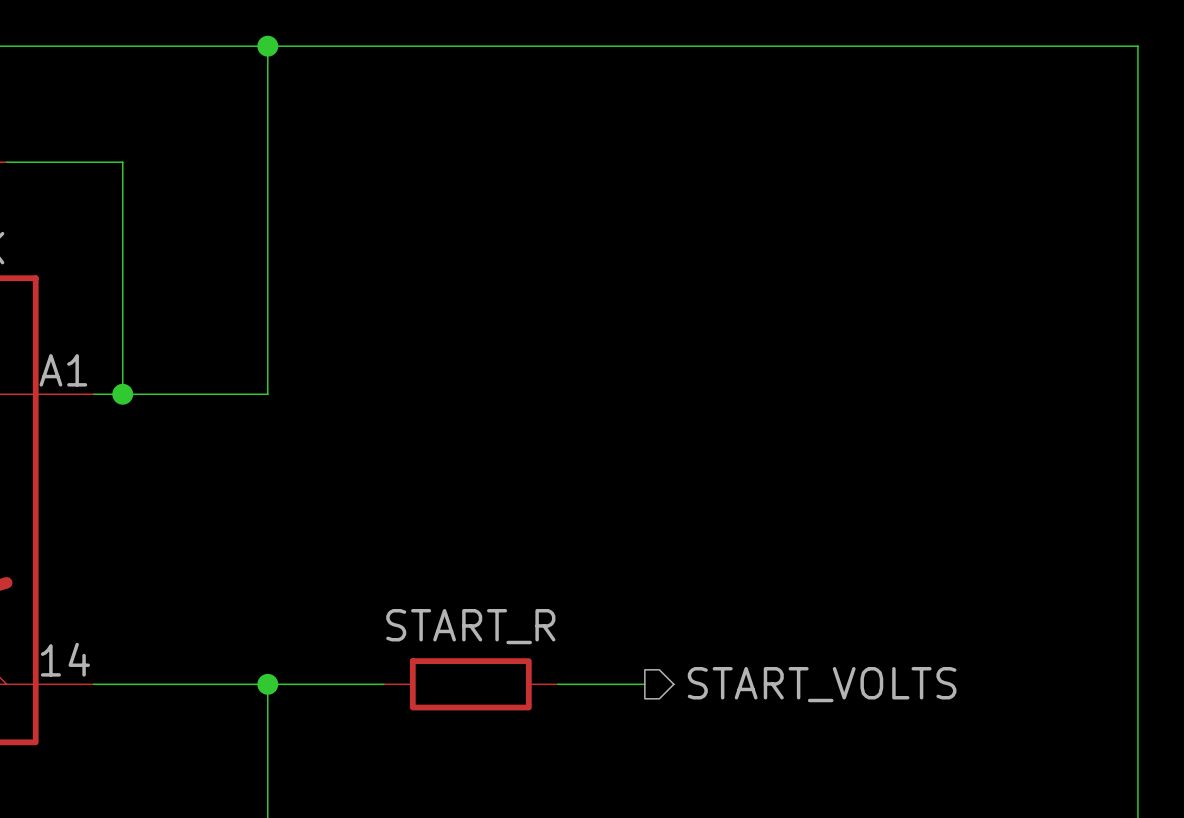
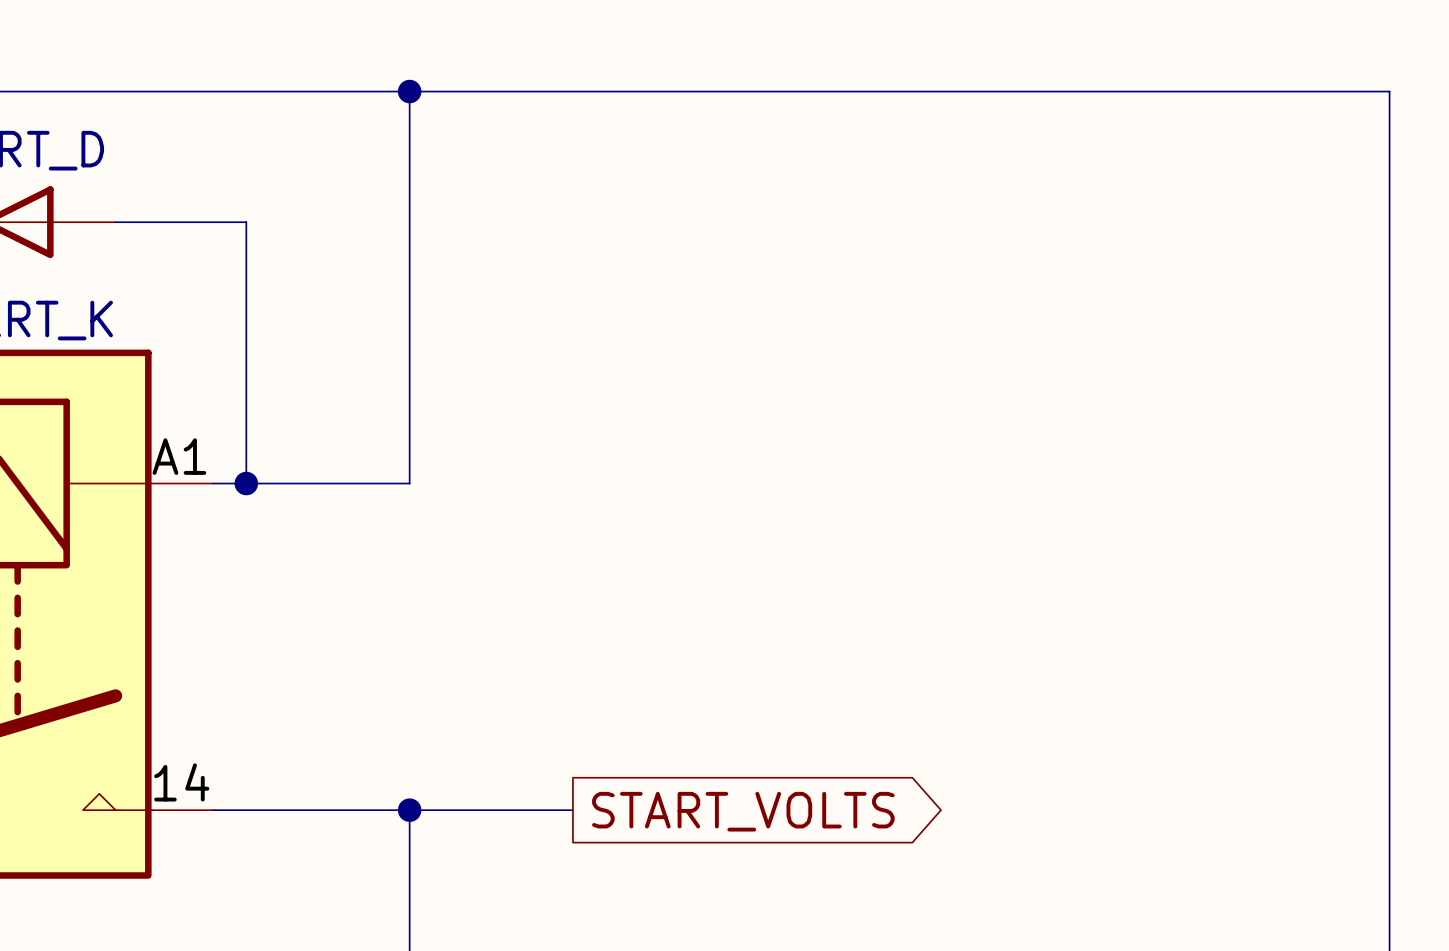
START_R: (470, 684) -> none
wire: (557, 684) (644, 684) -> none
hierarchical label: START_VOLTS (822, 684) -> none
global label: none -> START_VOLTS (743, 811)

